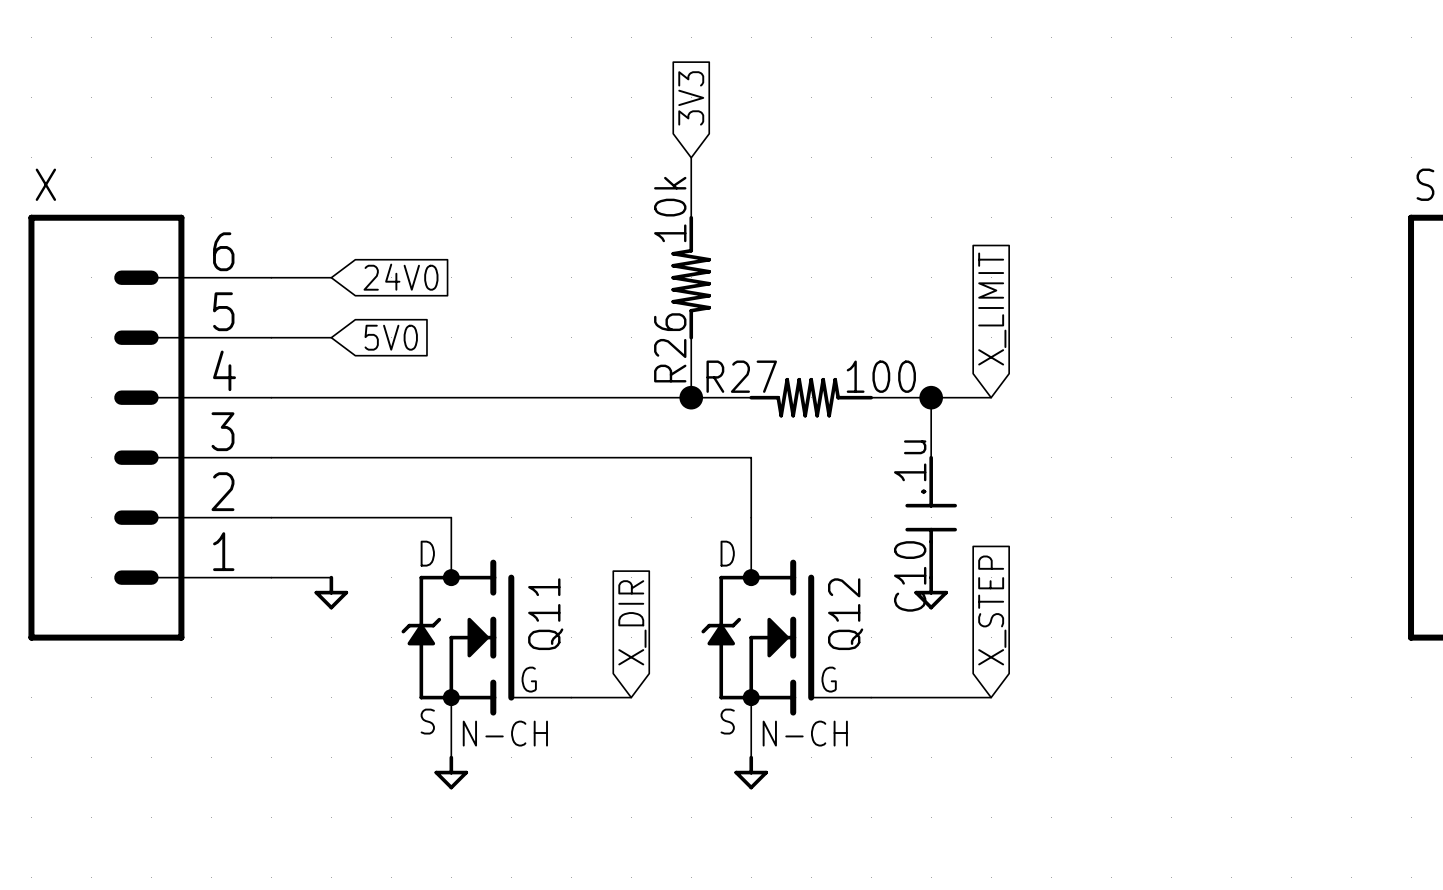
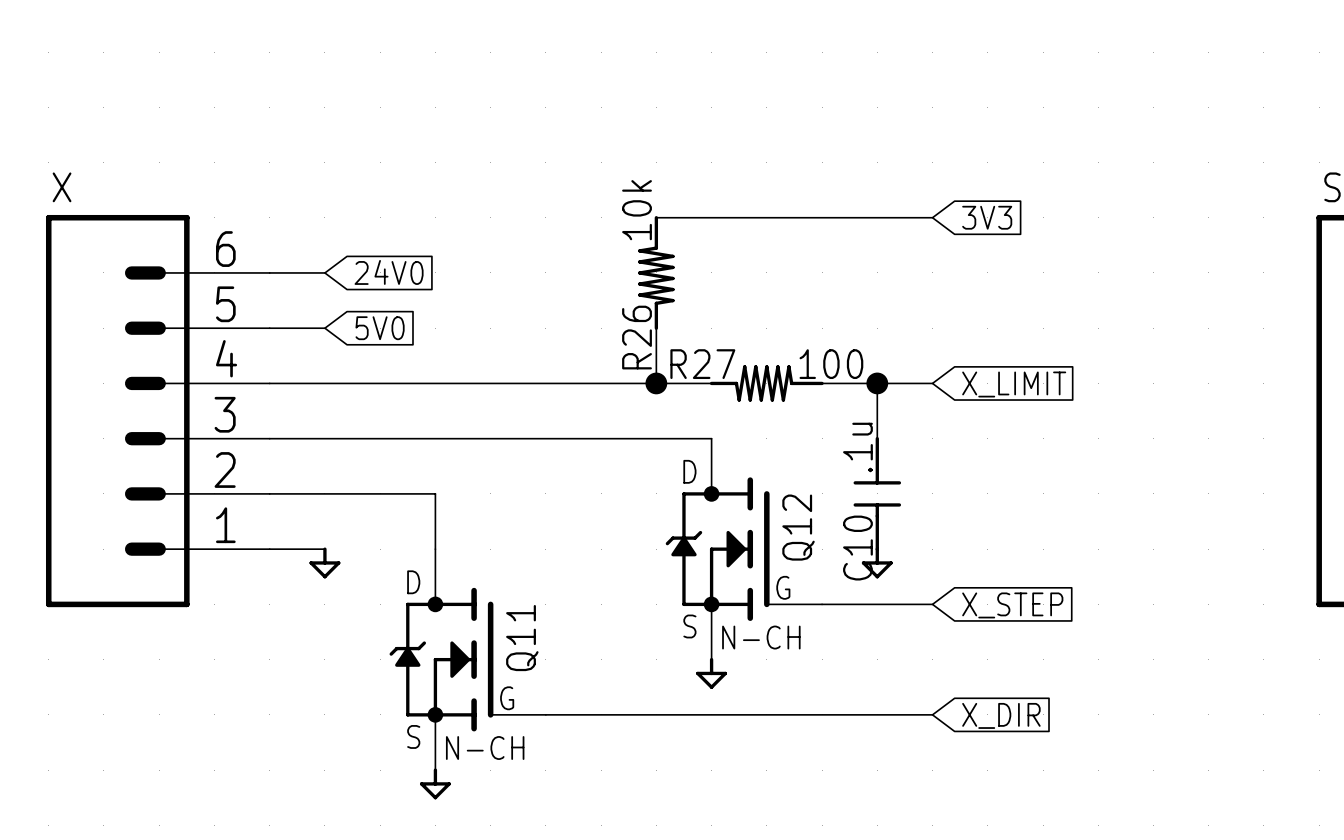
global label rotation: 0° (691, 98) -> 90° clockwise (987, 217)
global label position: 3V3 (691, 98) -> 3V3 (987, 217)
wire: (691, 157) (691, 217) -> (932, 217) (656, 217)
global label rotation: 0° (992, 309) -> 90° clockwise (1014, 384)
global label rotation: 0° (992, 610) -> 90° clockwise (1012, 605)
global label rotation: 0° (632, 622) -> 90° clockwise (1001, 715)
global label position: X_DIR (632, 622) -> X_DIR (1001, 715)
Q11 position: (486, 637) -> (467, 659)
Q12 position: (786, 637) -> (743, 549)
wire: (571, 697) (631, 697) -> none
wire: (871, 697) (991, 697) -> (822, 604) (932, 604)
wire: none -> (545, 714) (932, 714)
power symbol position: (451, 772) -> (435, 783)
power symbol position: (751, 772) -> (711, 673)

